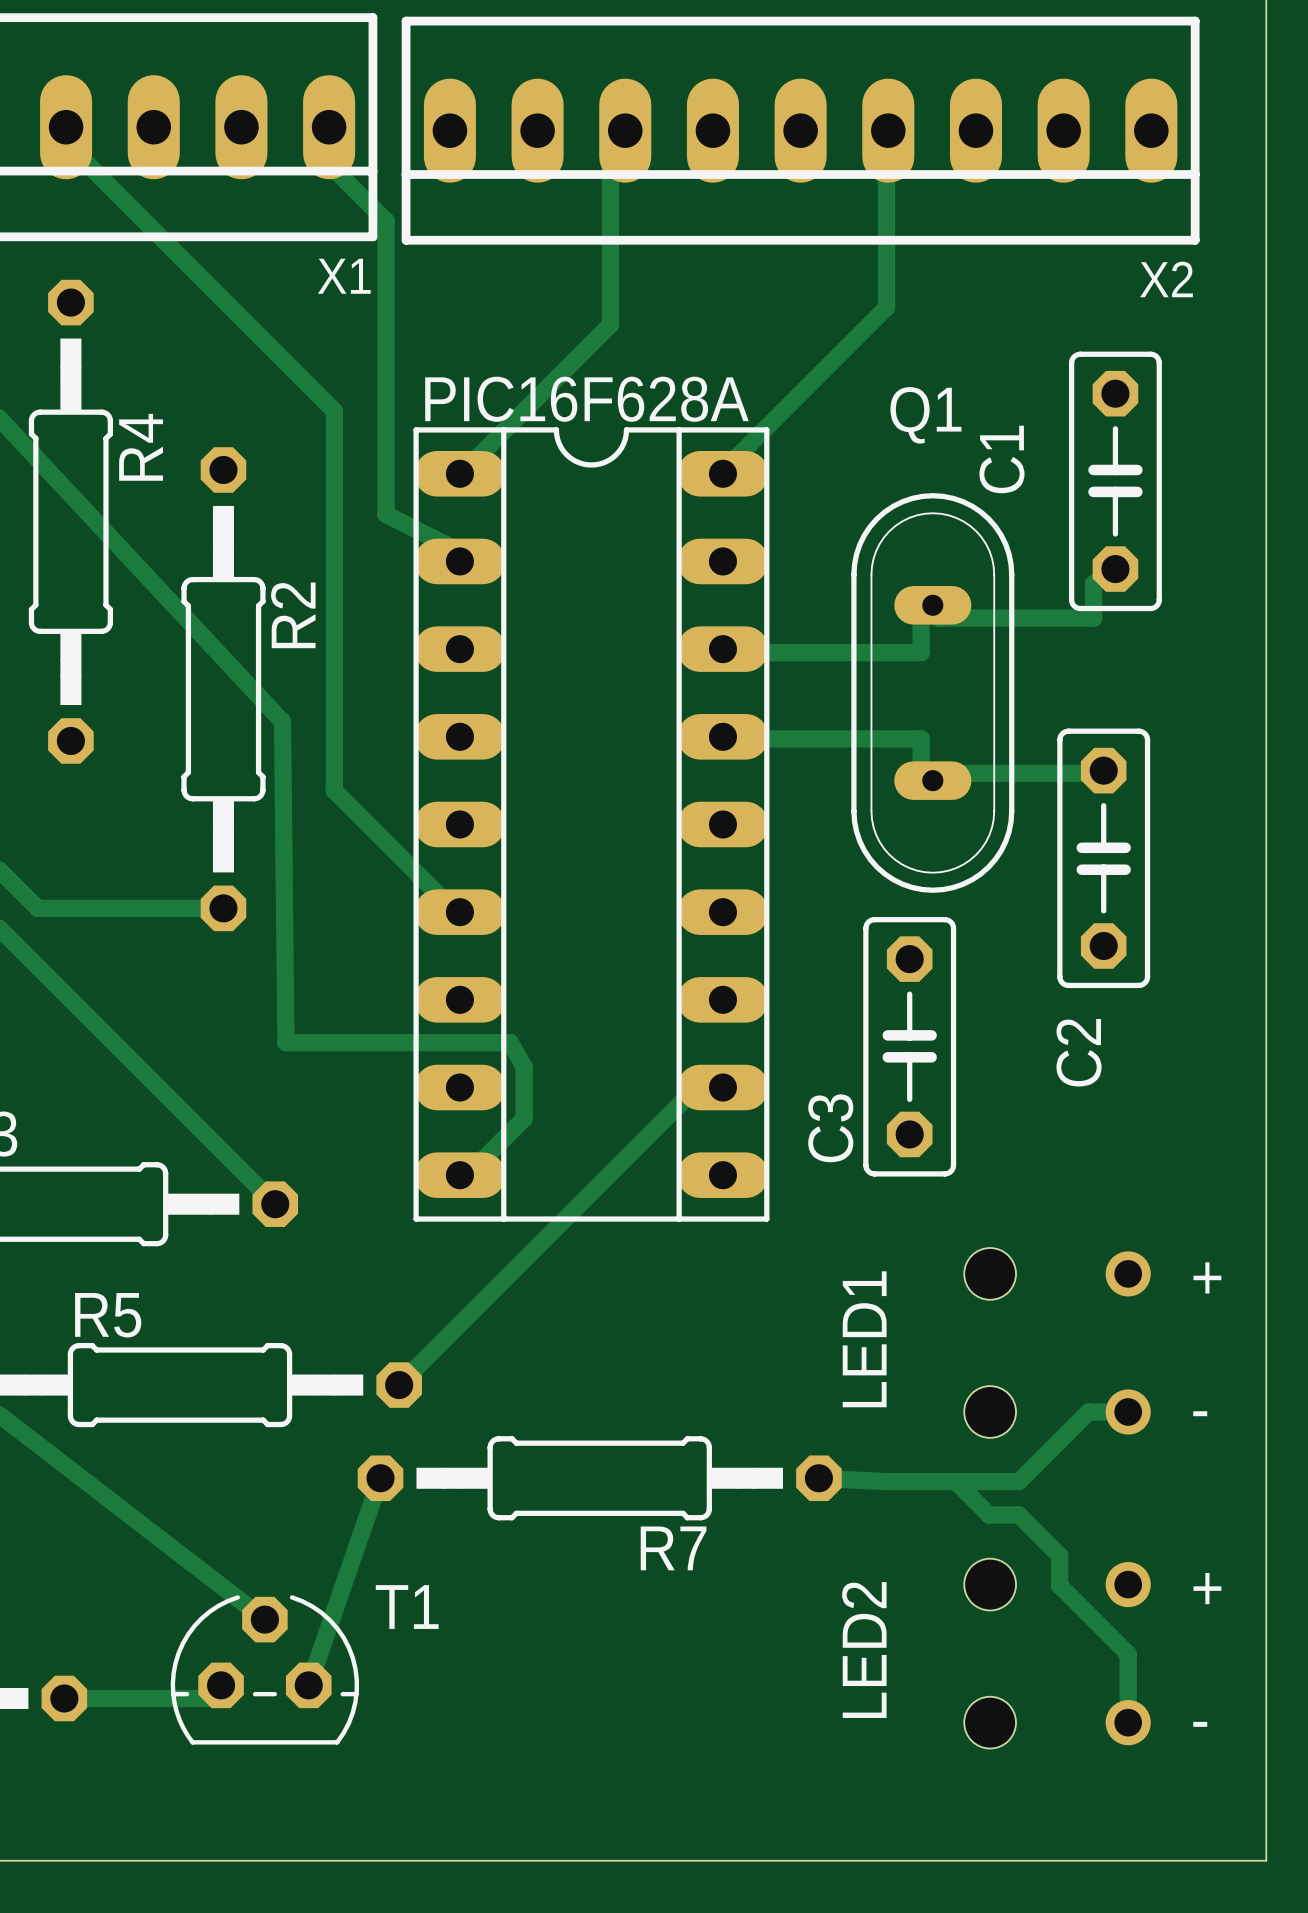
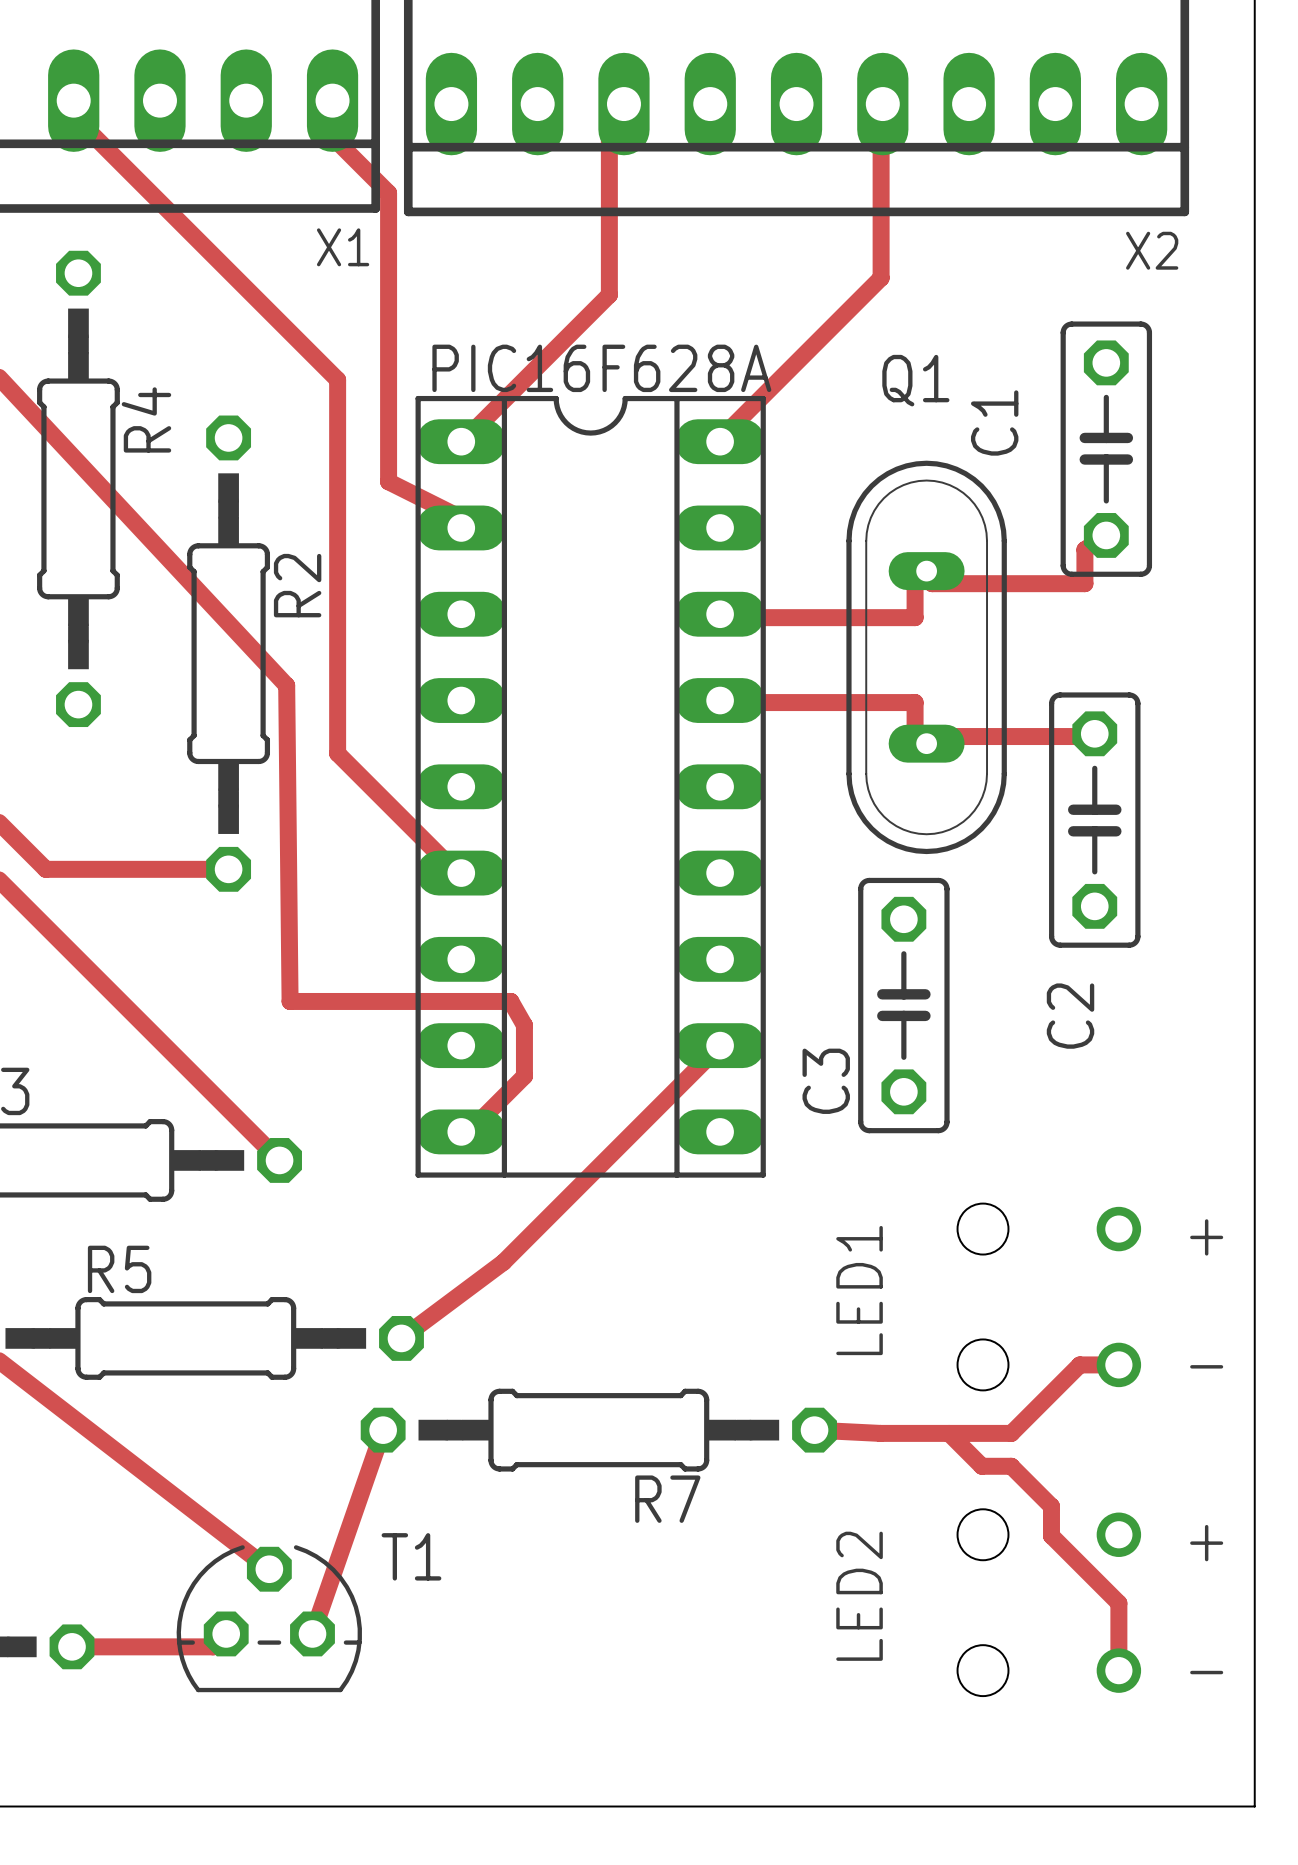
track: (722, 1087) (696, 1087) (399, 1385) -> (720, 1045) (503, 1262) (401, 1338)

